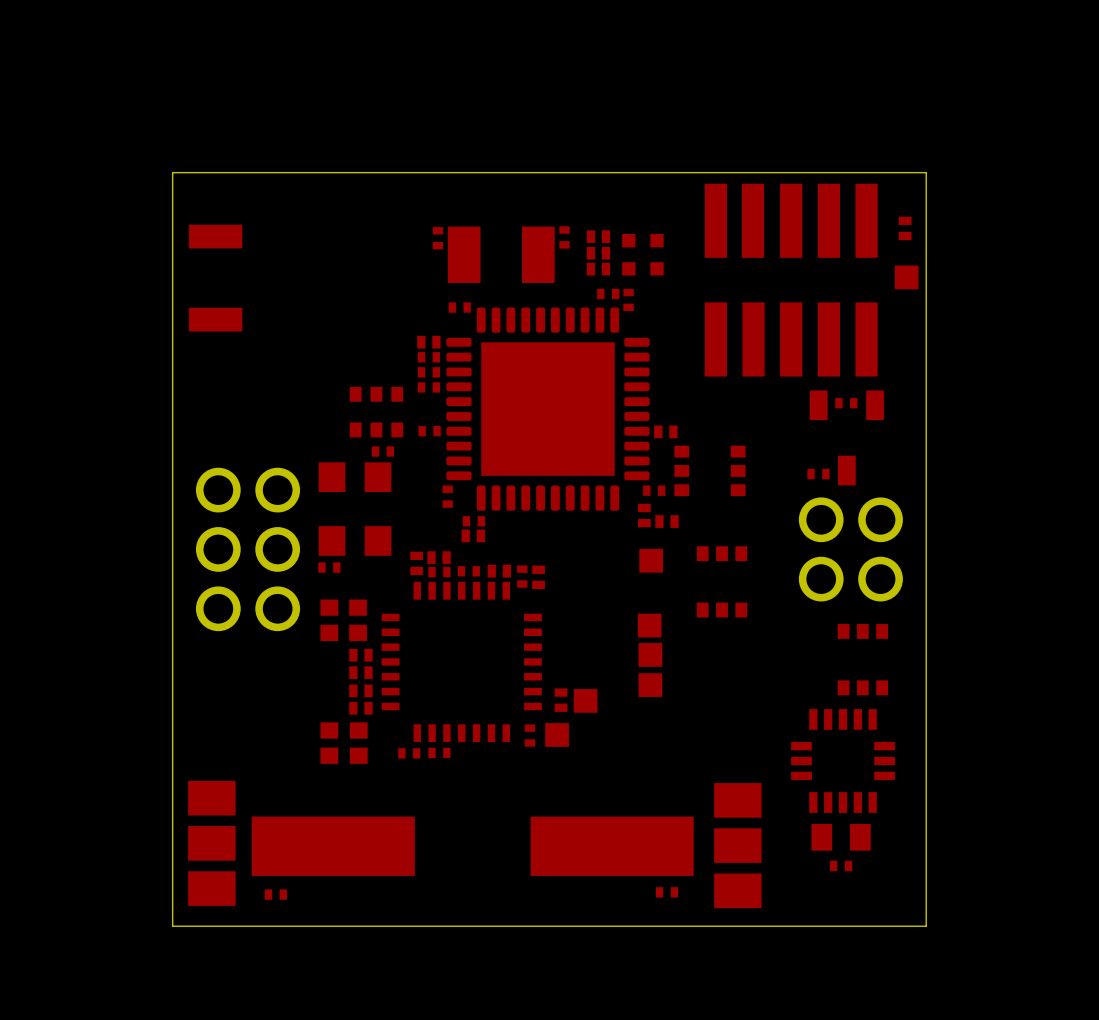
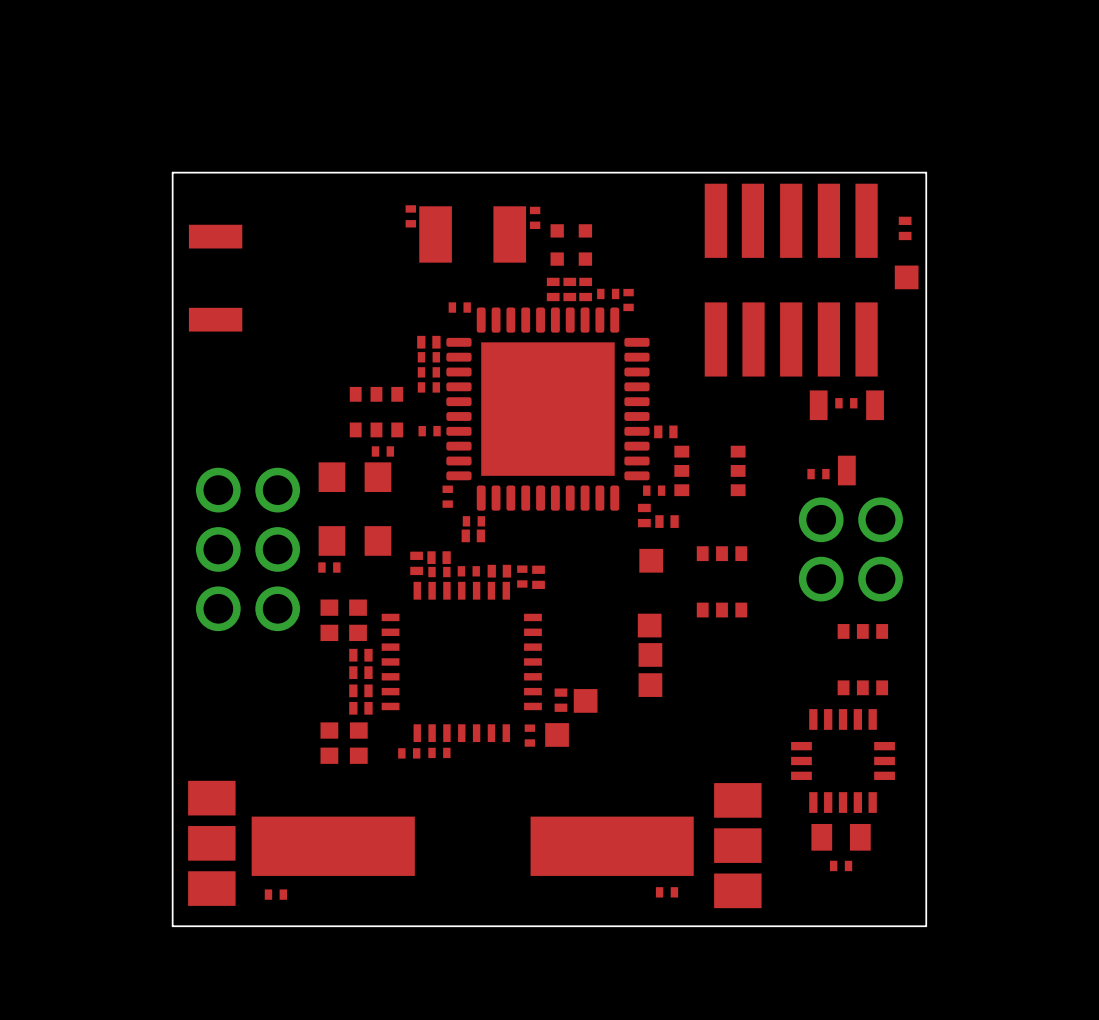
part: none -> (535, 217)
part footprint: [559, 226, 570, 249] -> [550, 224, 593, 266]
part: (598, 236) -> none
part position: (437, 238) -> (410, 216)
part: (598, 253) -> none
part position: (501, 254) -> (472, 234)
part: (642, 254) -> none
part: (598, 269) -> none
part: none -> (553, 289)
part: none -> (569, 289)
part: none -> (585, 289)

